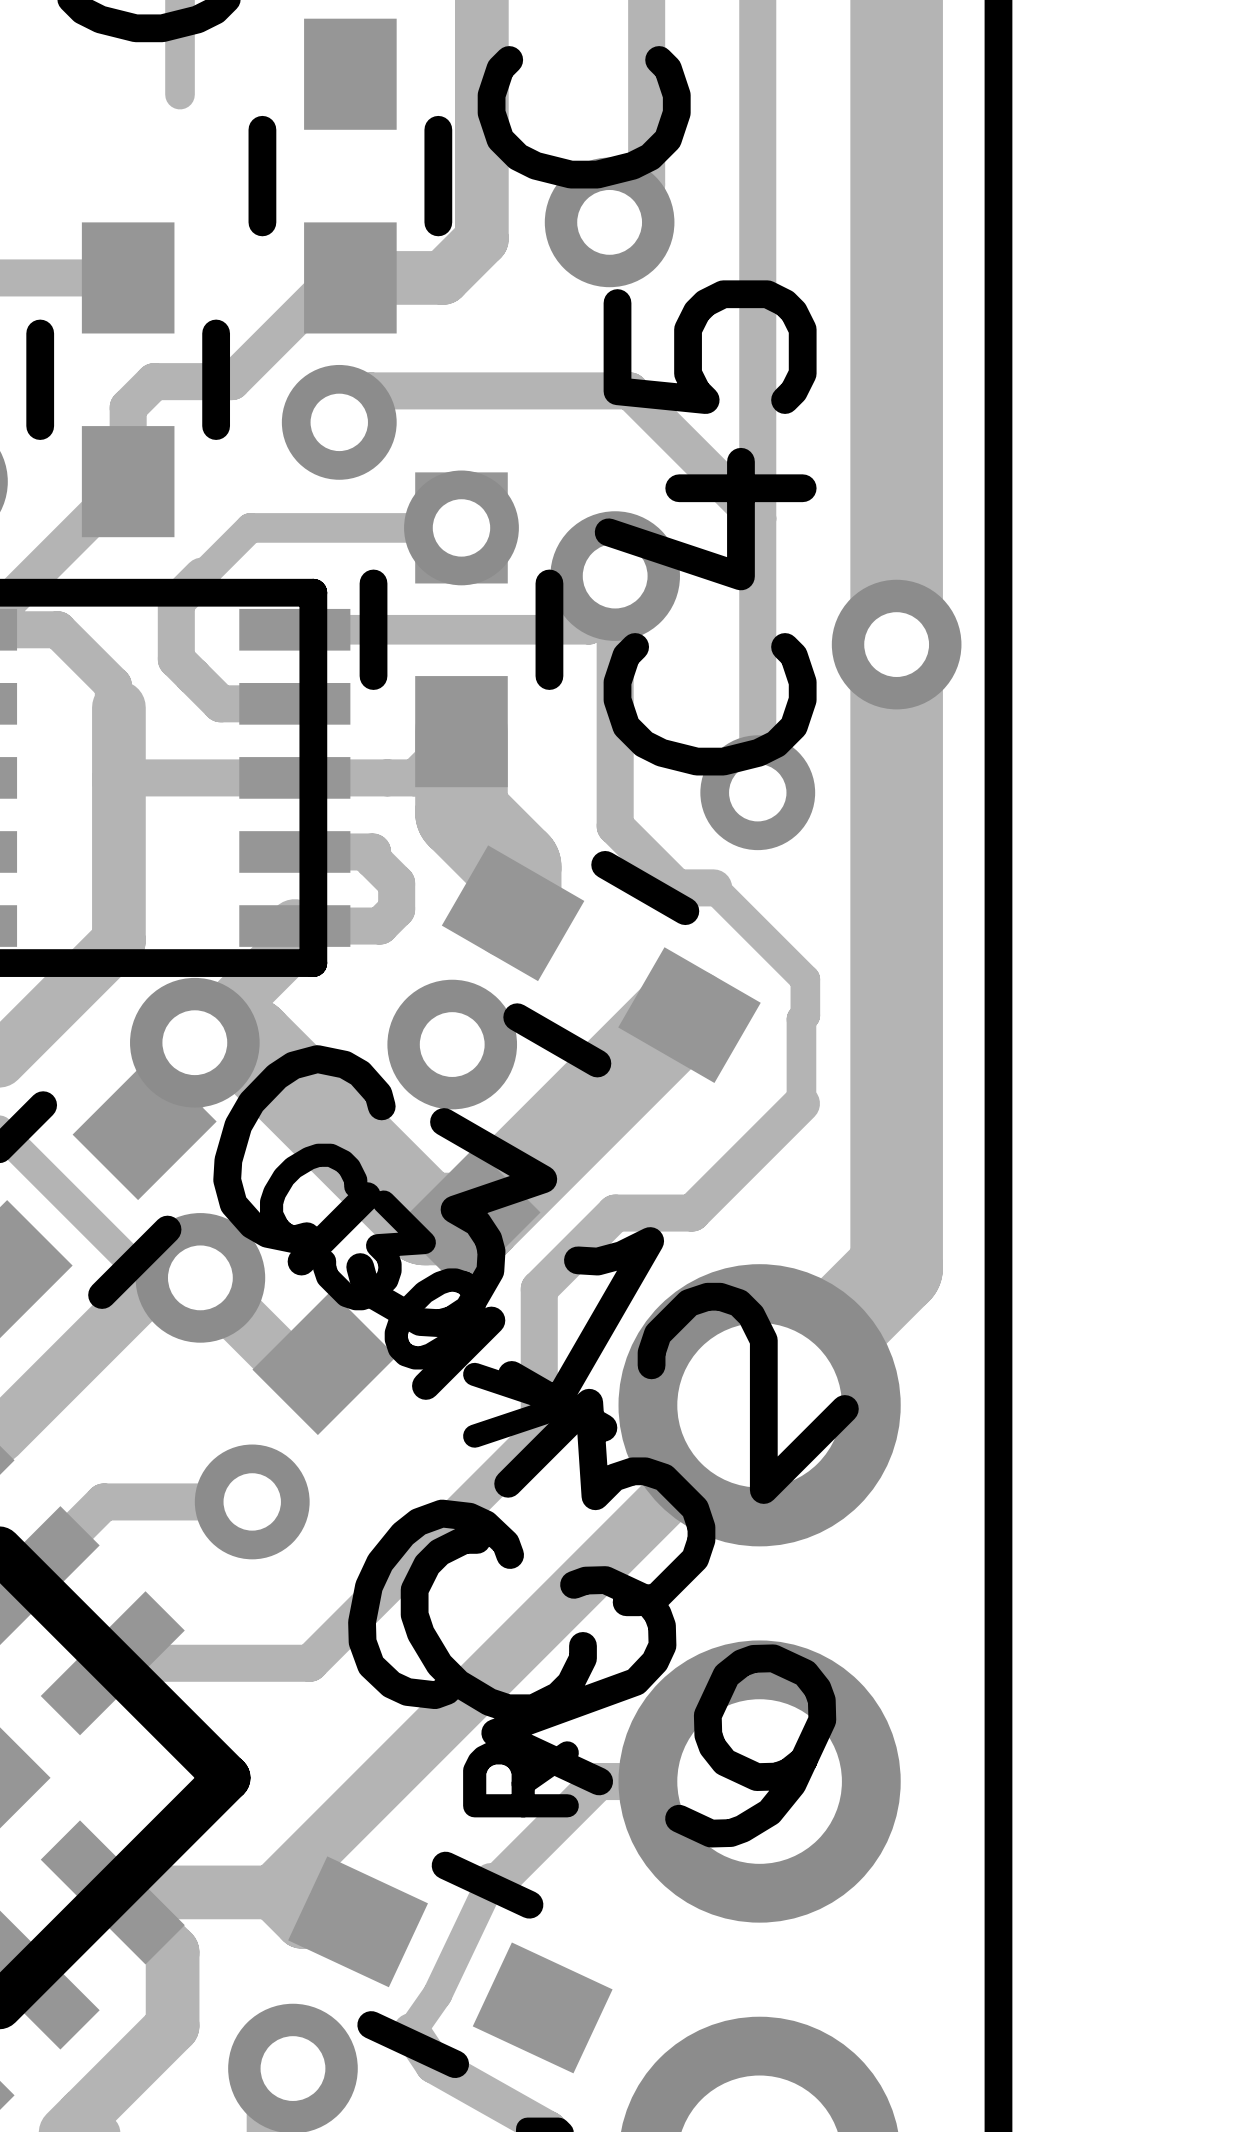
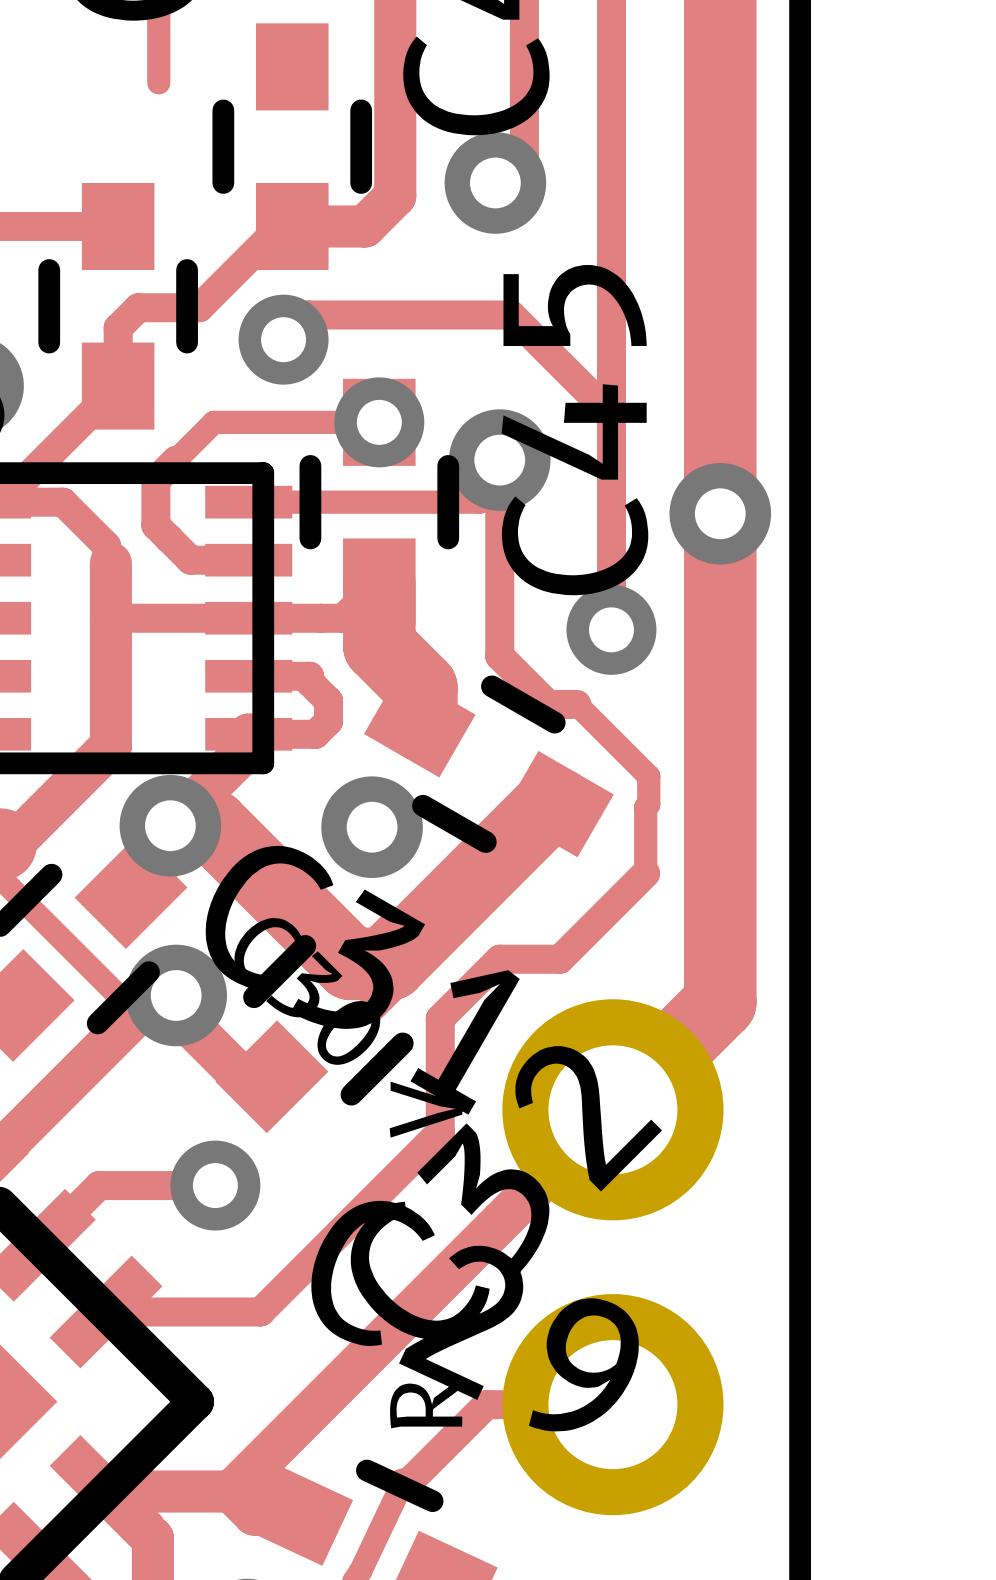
via position: (200, 1277) -> (176, 995)

